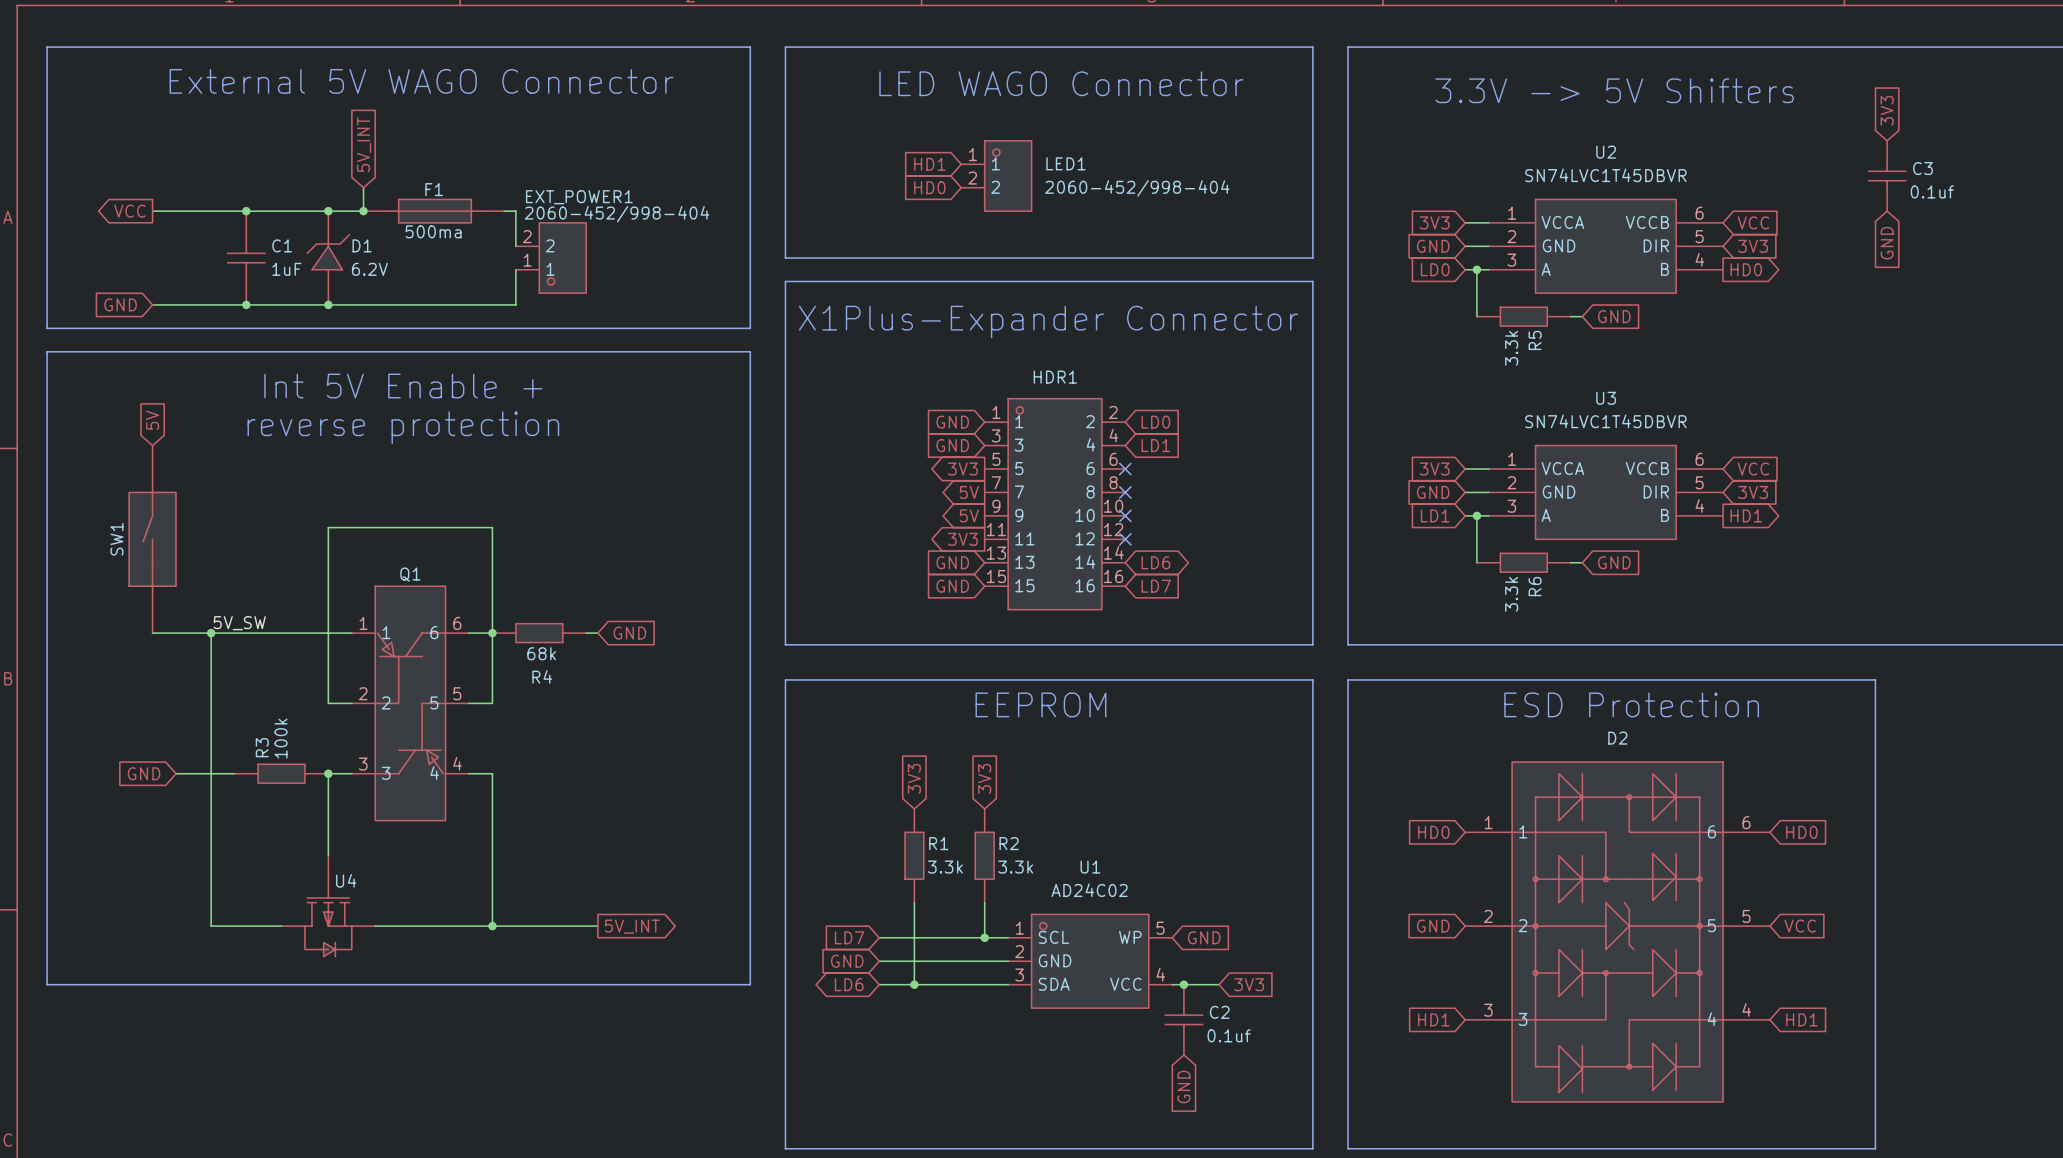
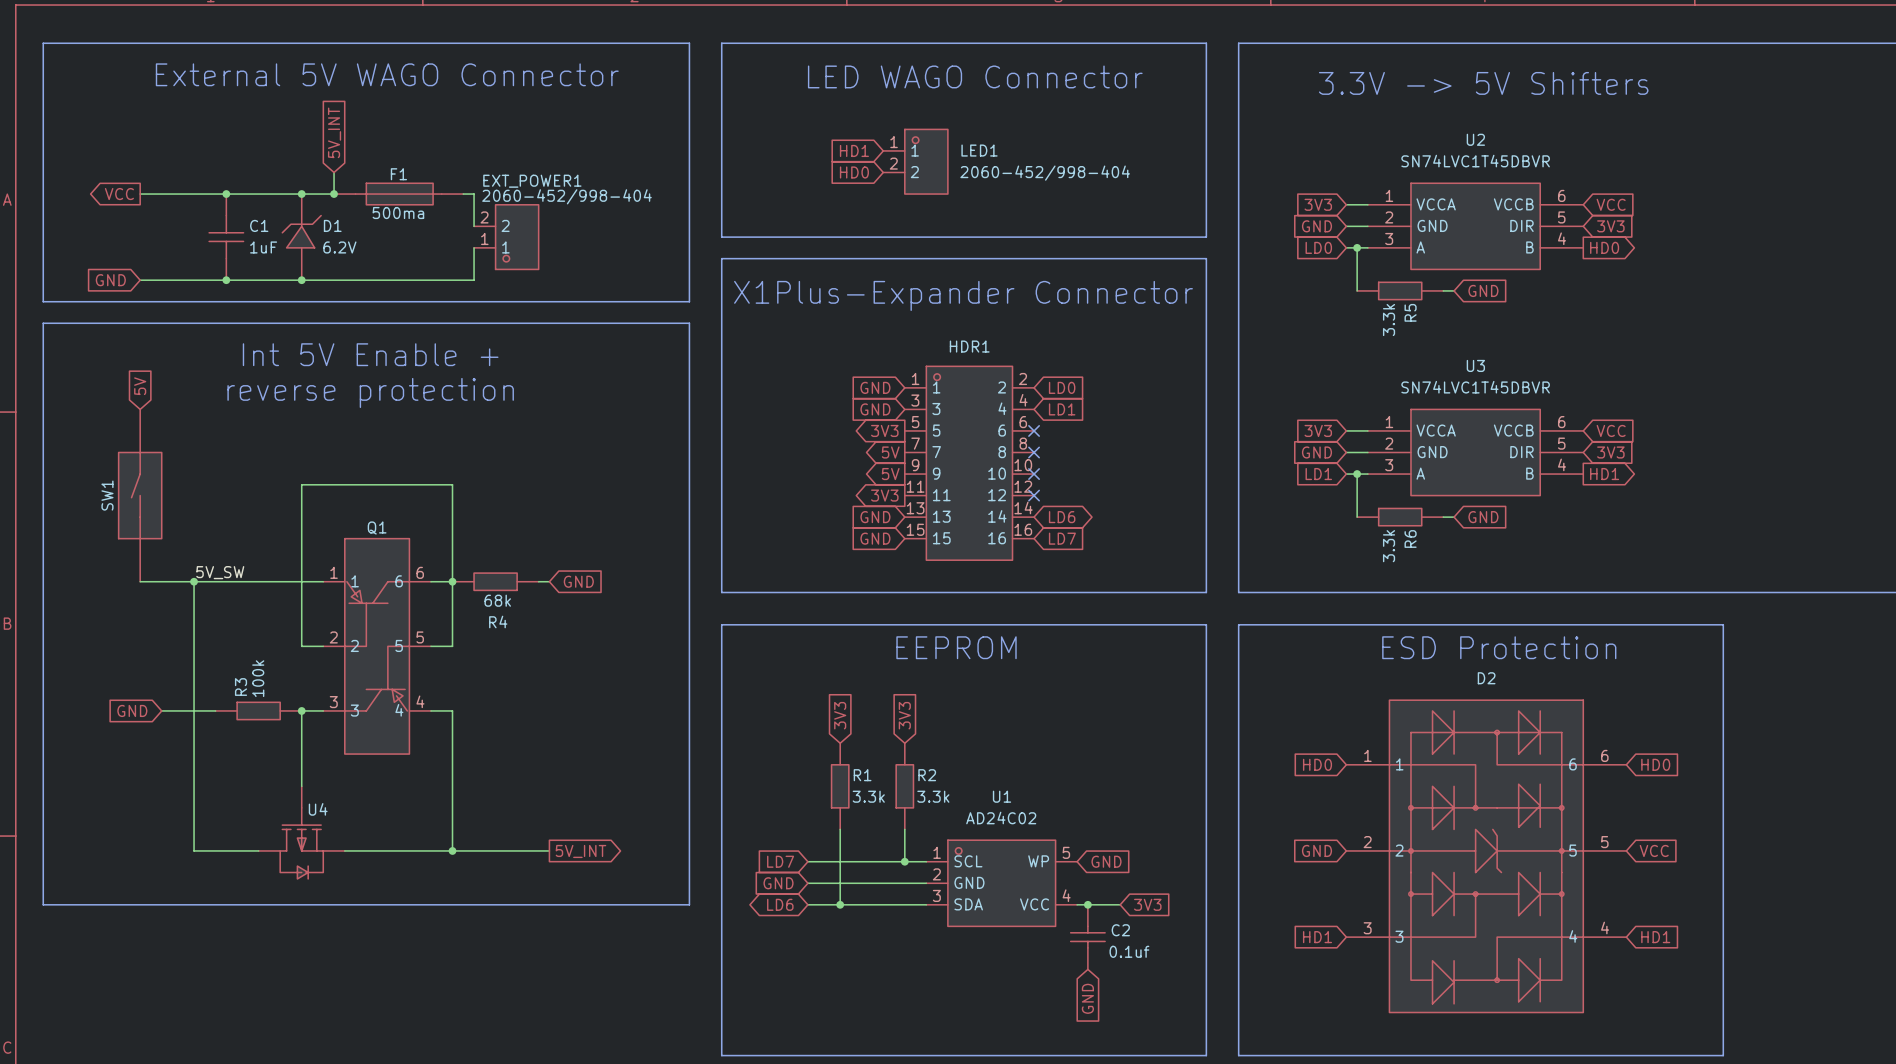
global label: 3V3 (1887, 110) -> none
C3: 0.1uf (1887, 176) -> none
global label: GND (1887, 243) -> none

